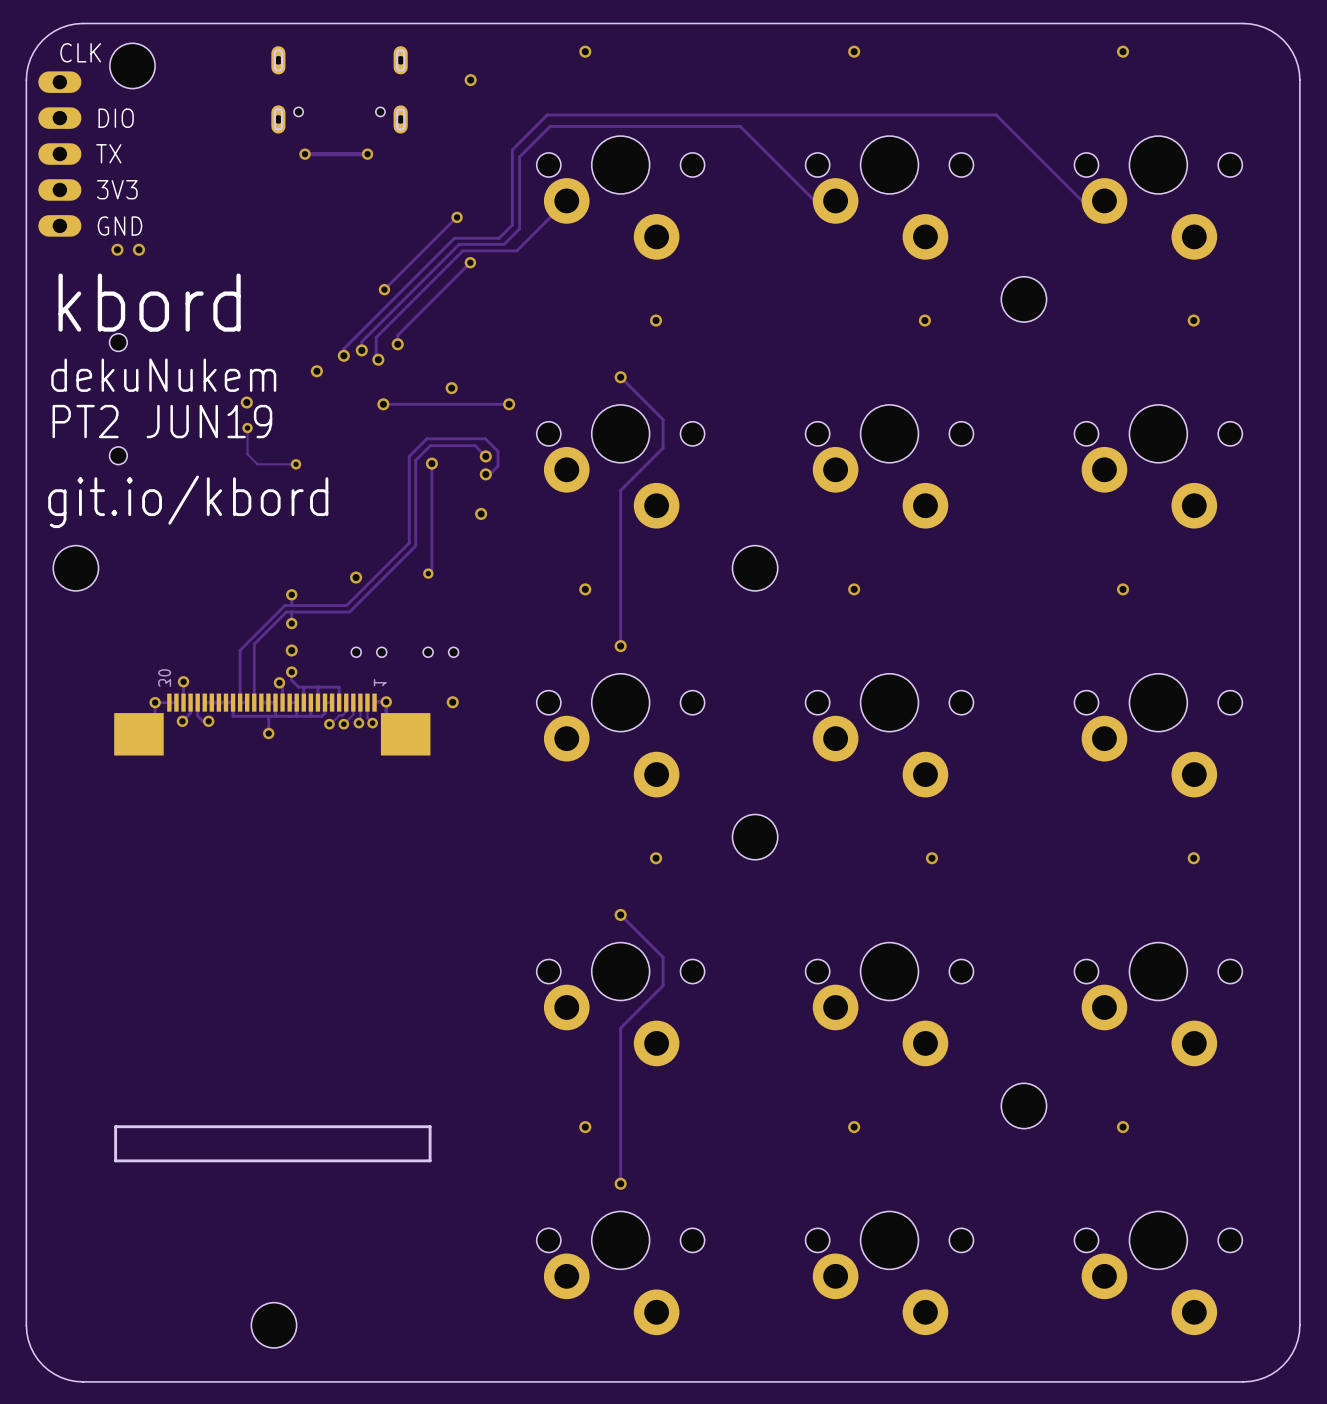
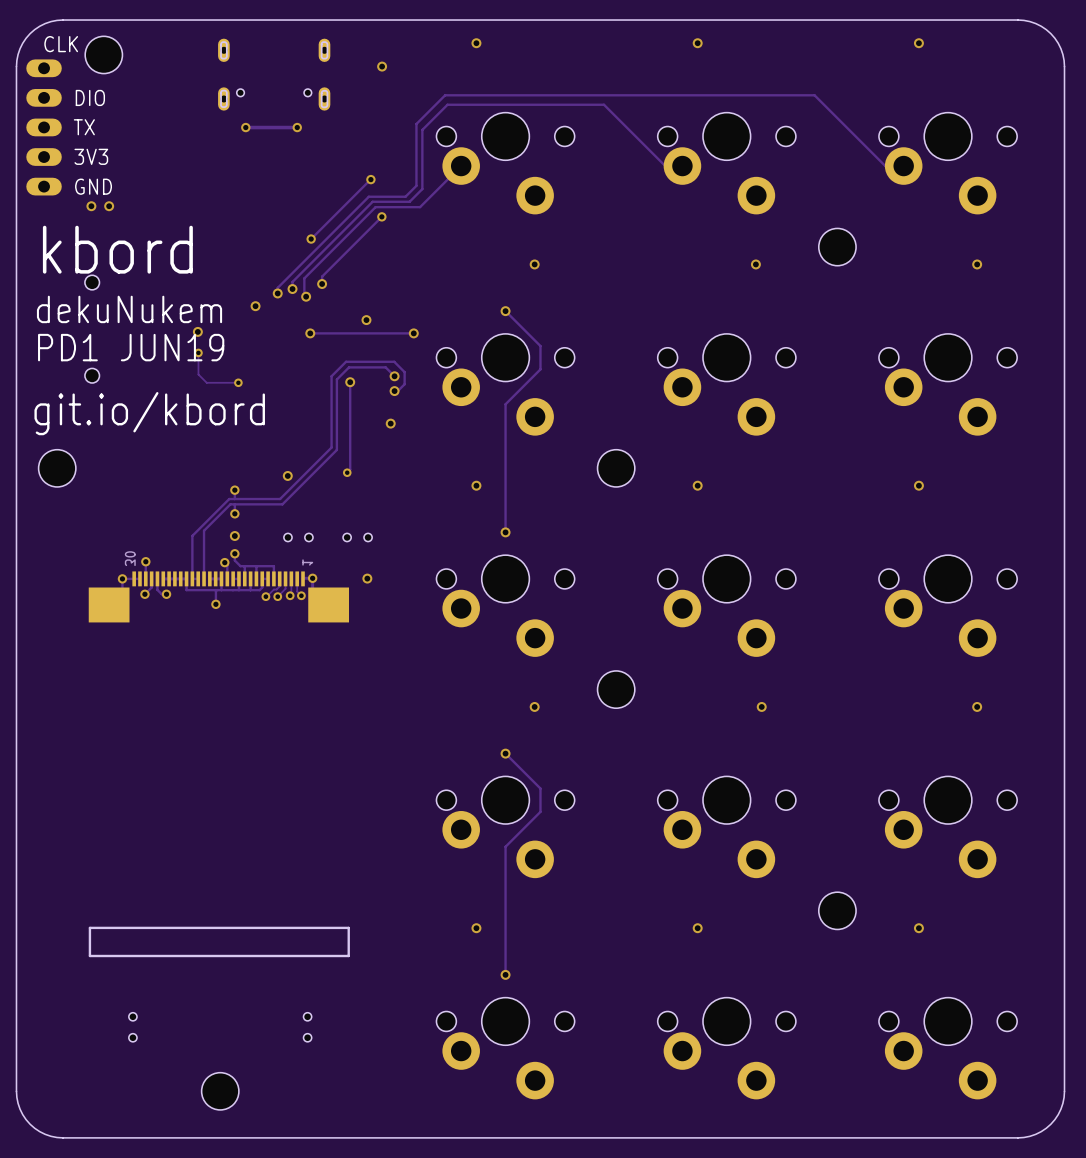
text: PT2 JUN19 (162, 421) -> PD1 JUN19 (131, 347)
part: none -> (132, 1027)
part: none -> (307, 1027)

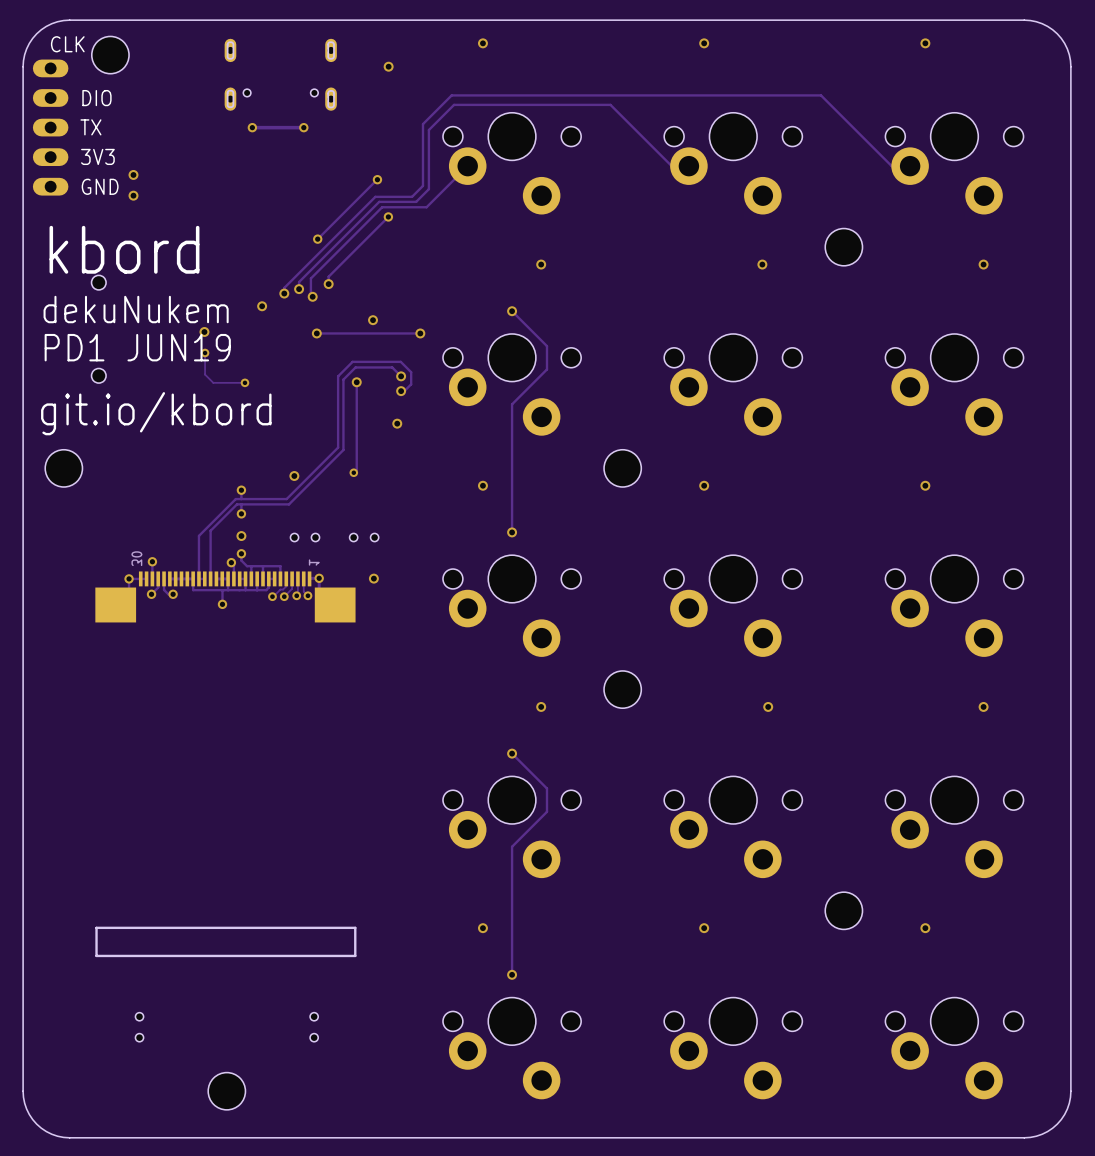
via: none -> (133, 174)
via: none -> (133, 195)
via: (91, 206) -> none
via: (109, 206) -> none

